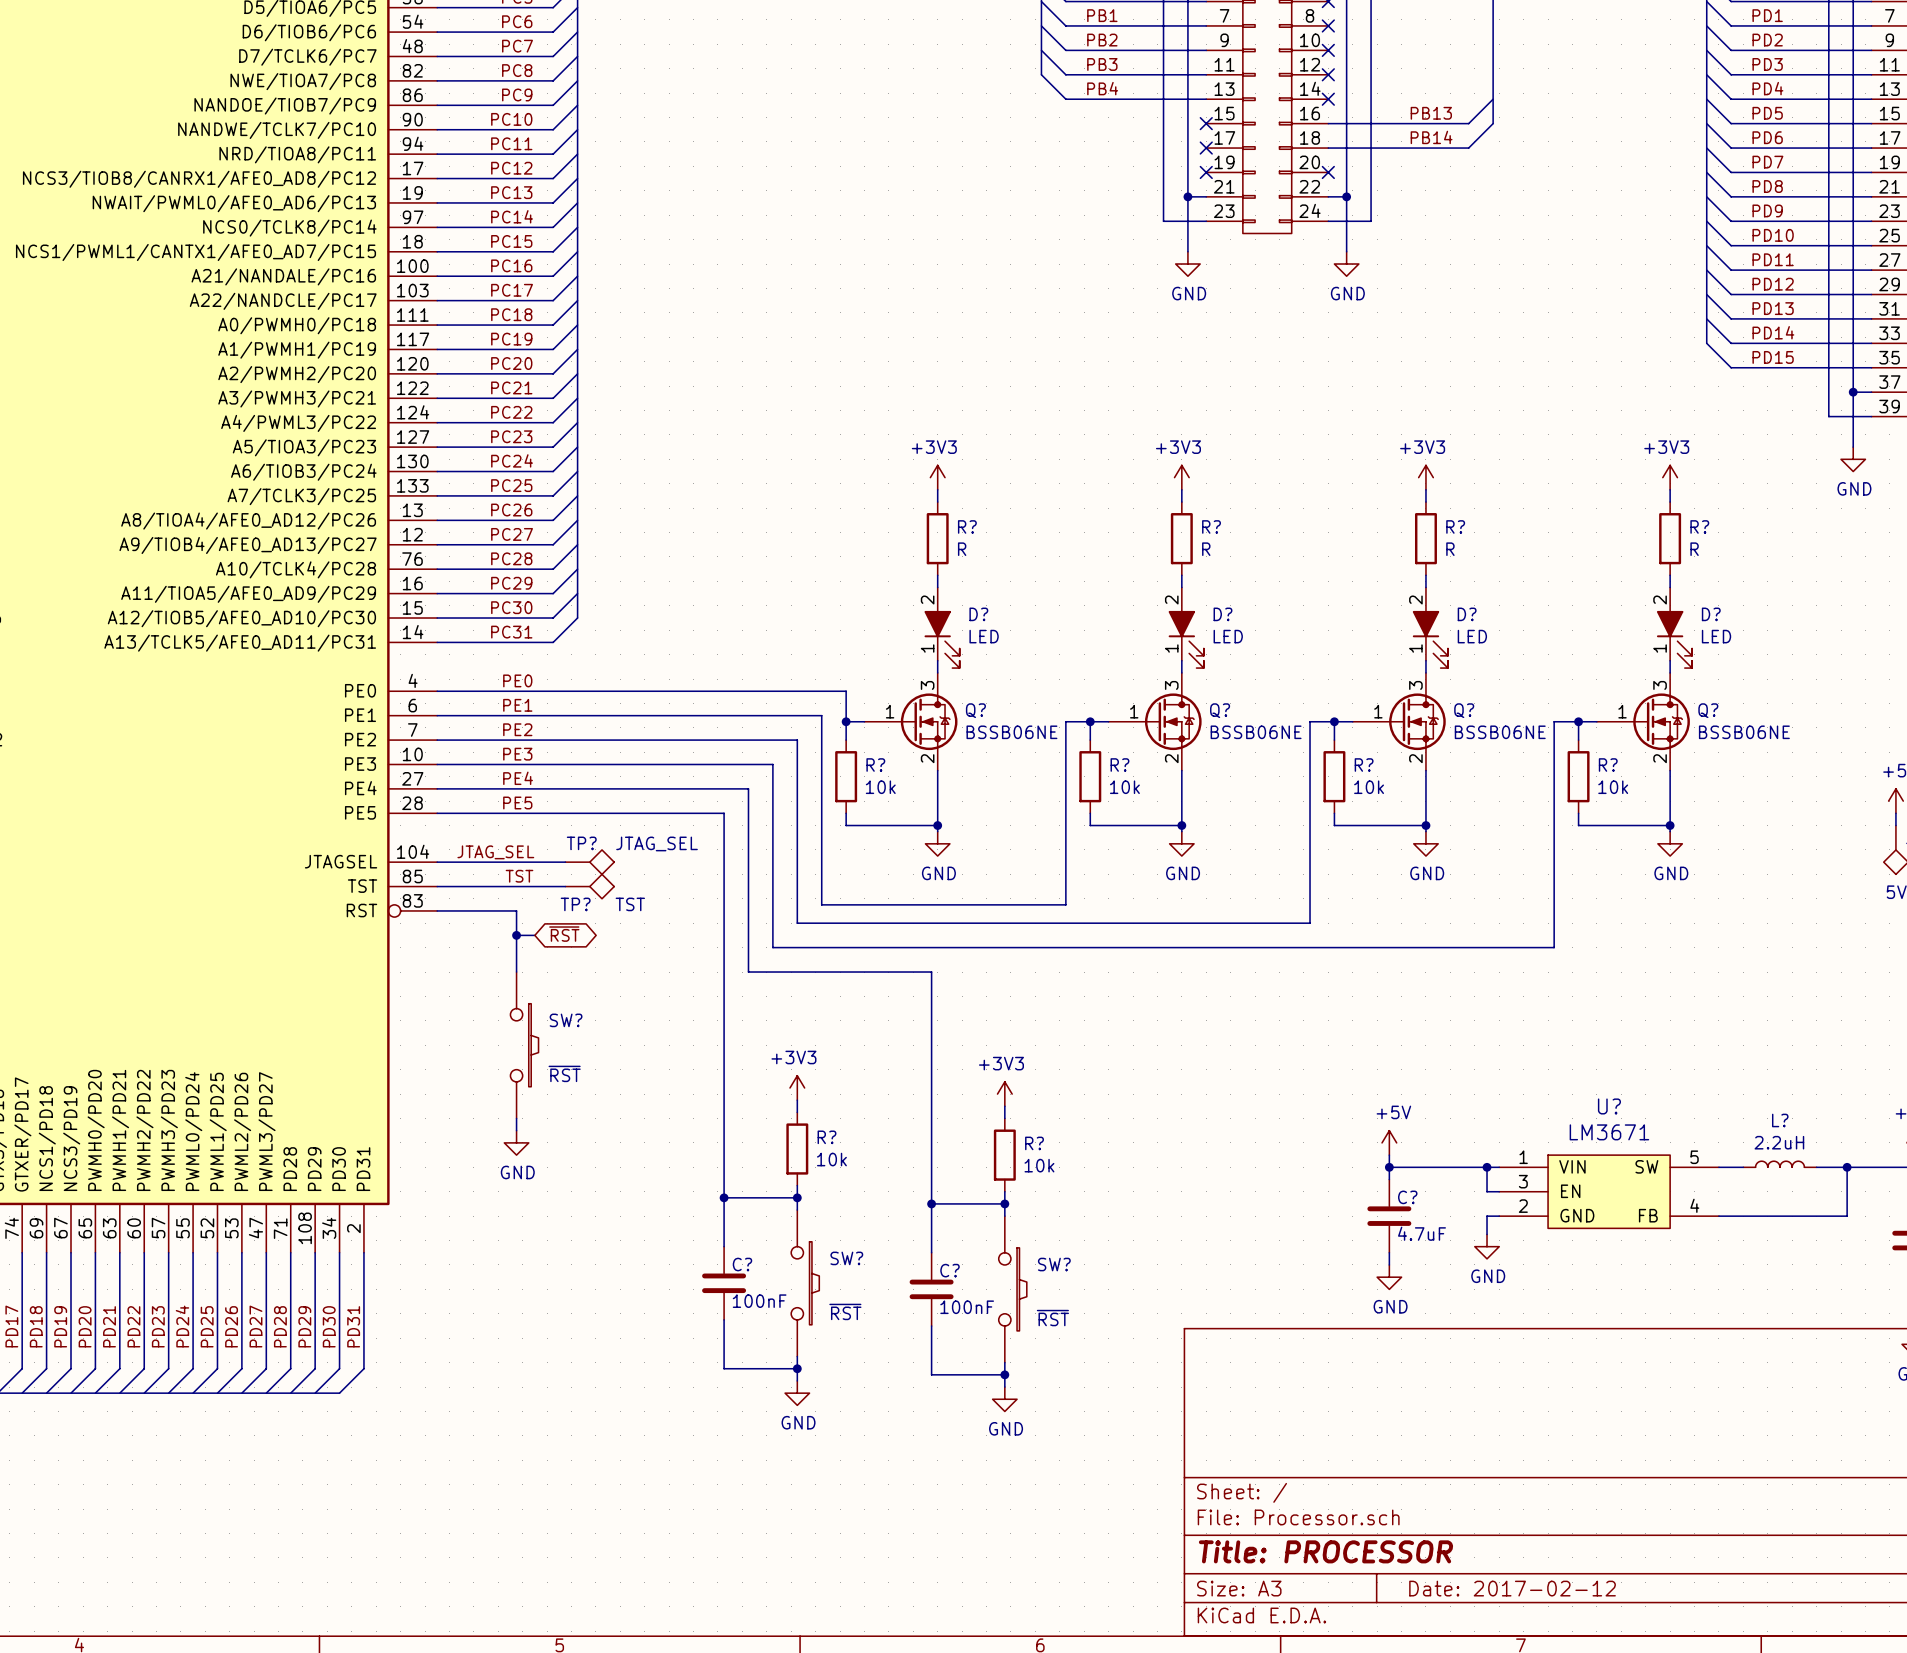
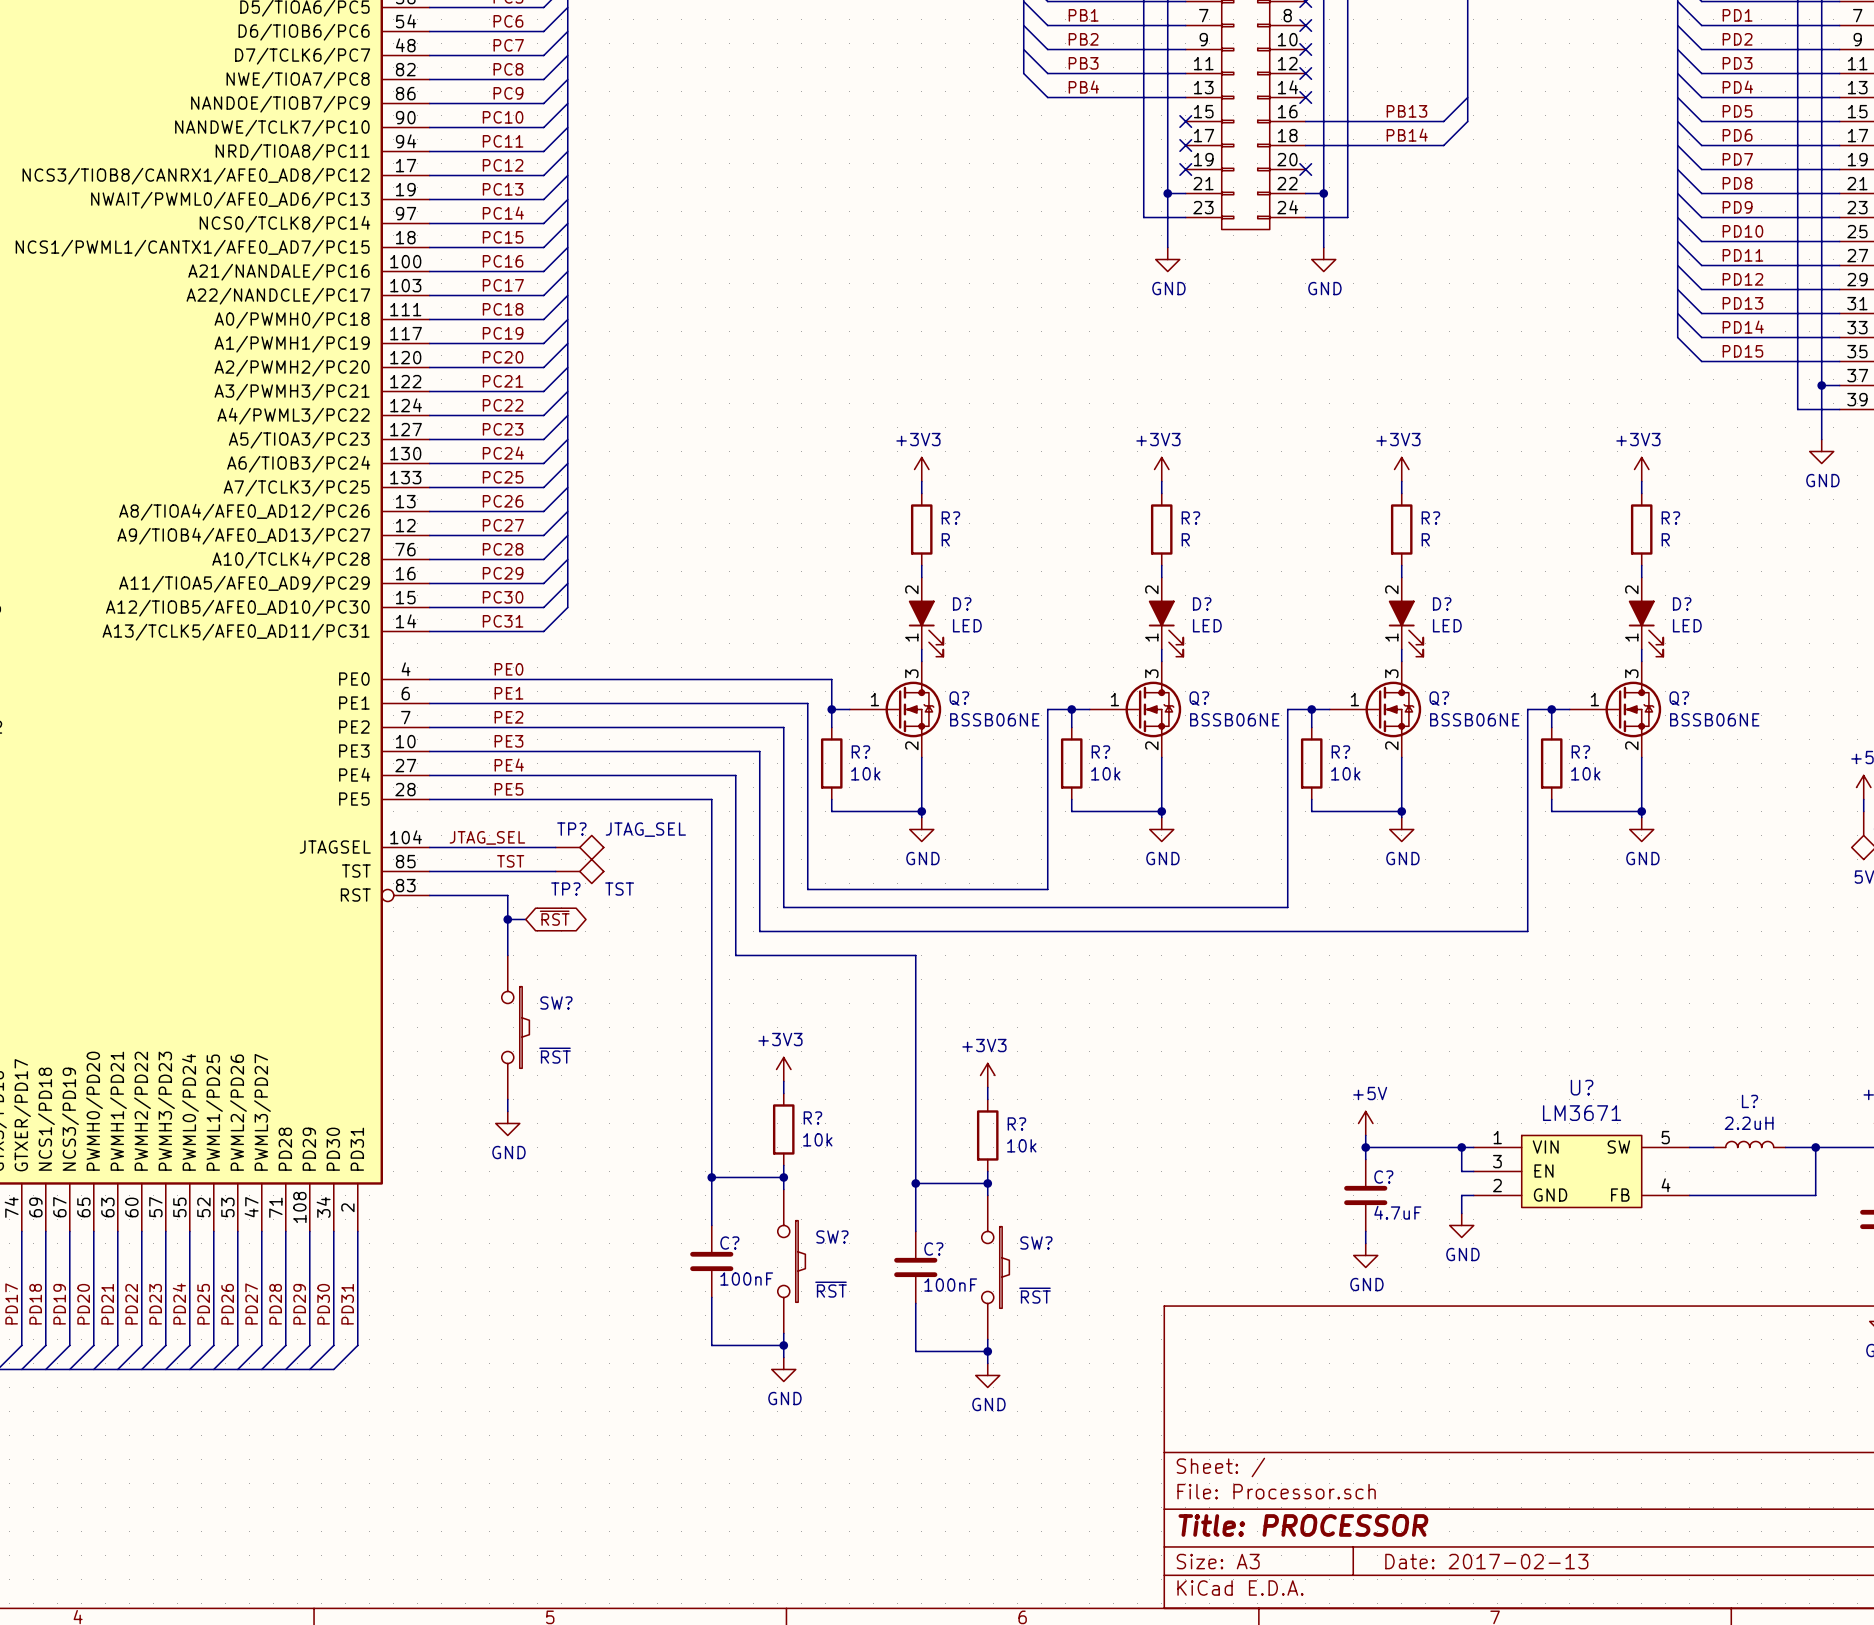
title block: Date: 2017-02-12 (1512, 1588) -> Date: 2017-02-13 (1486, 1561)

